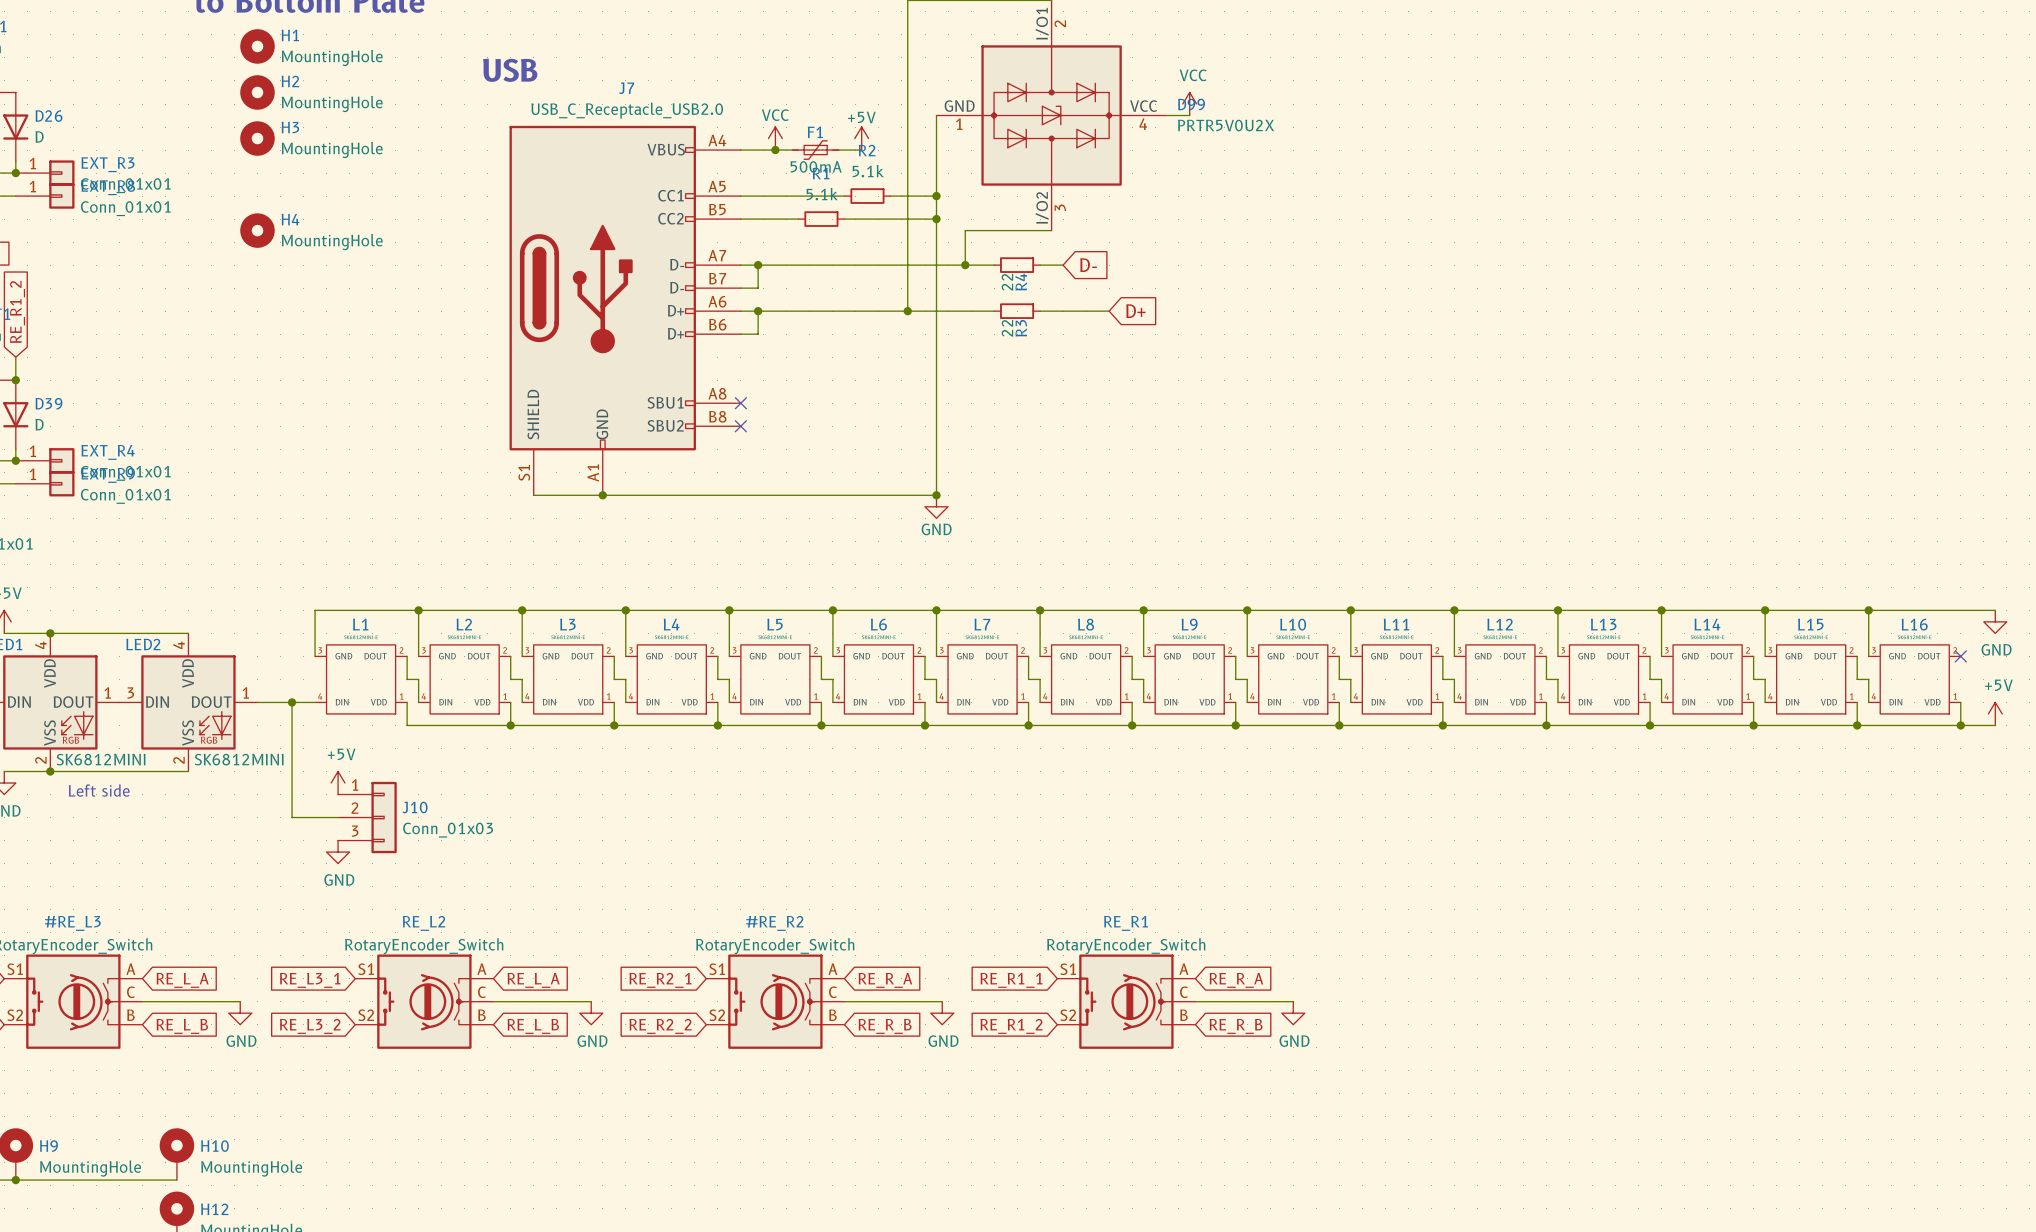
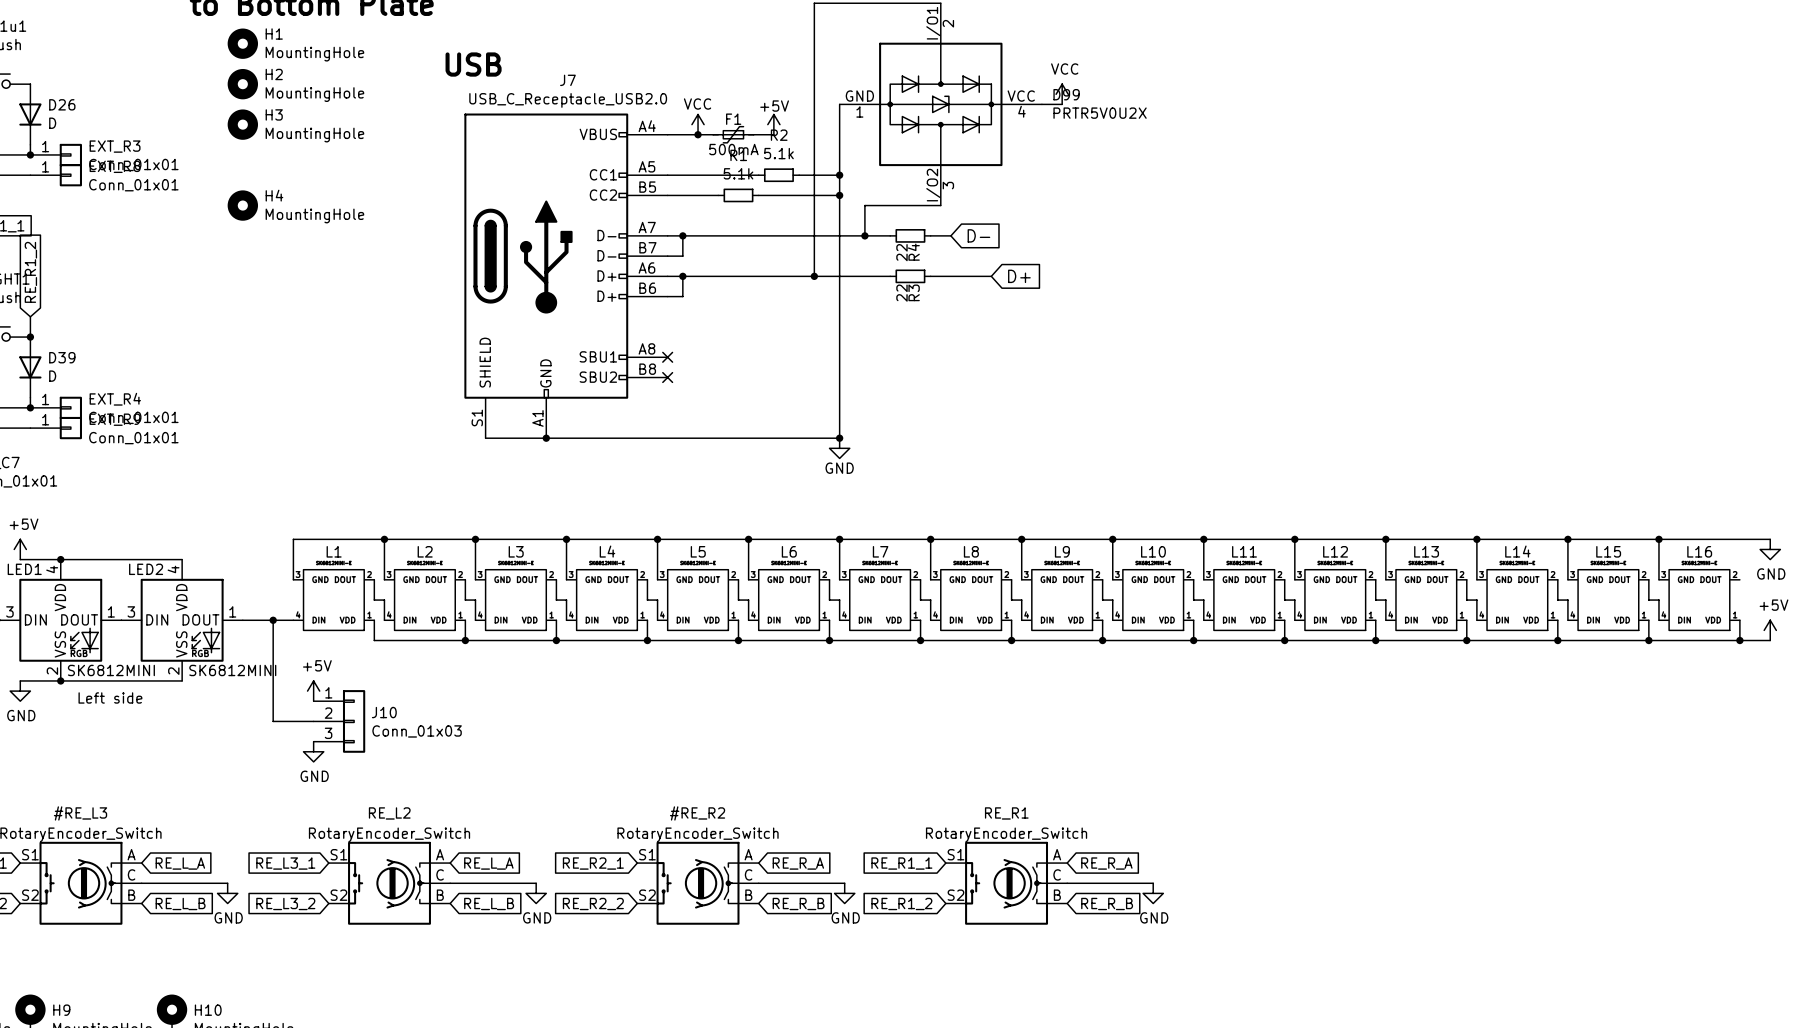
no-connect mark: (1960, 656) -> none

